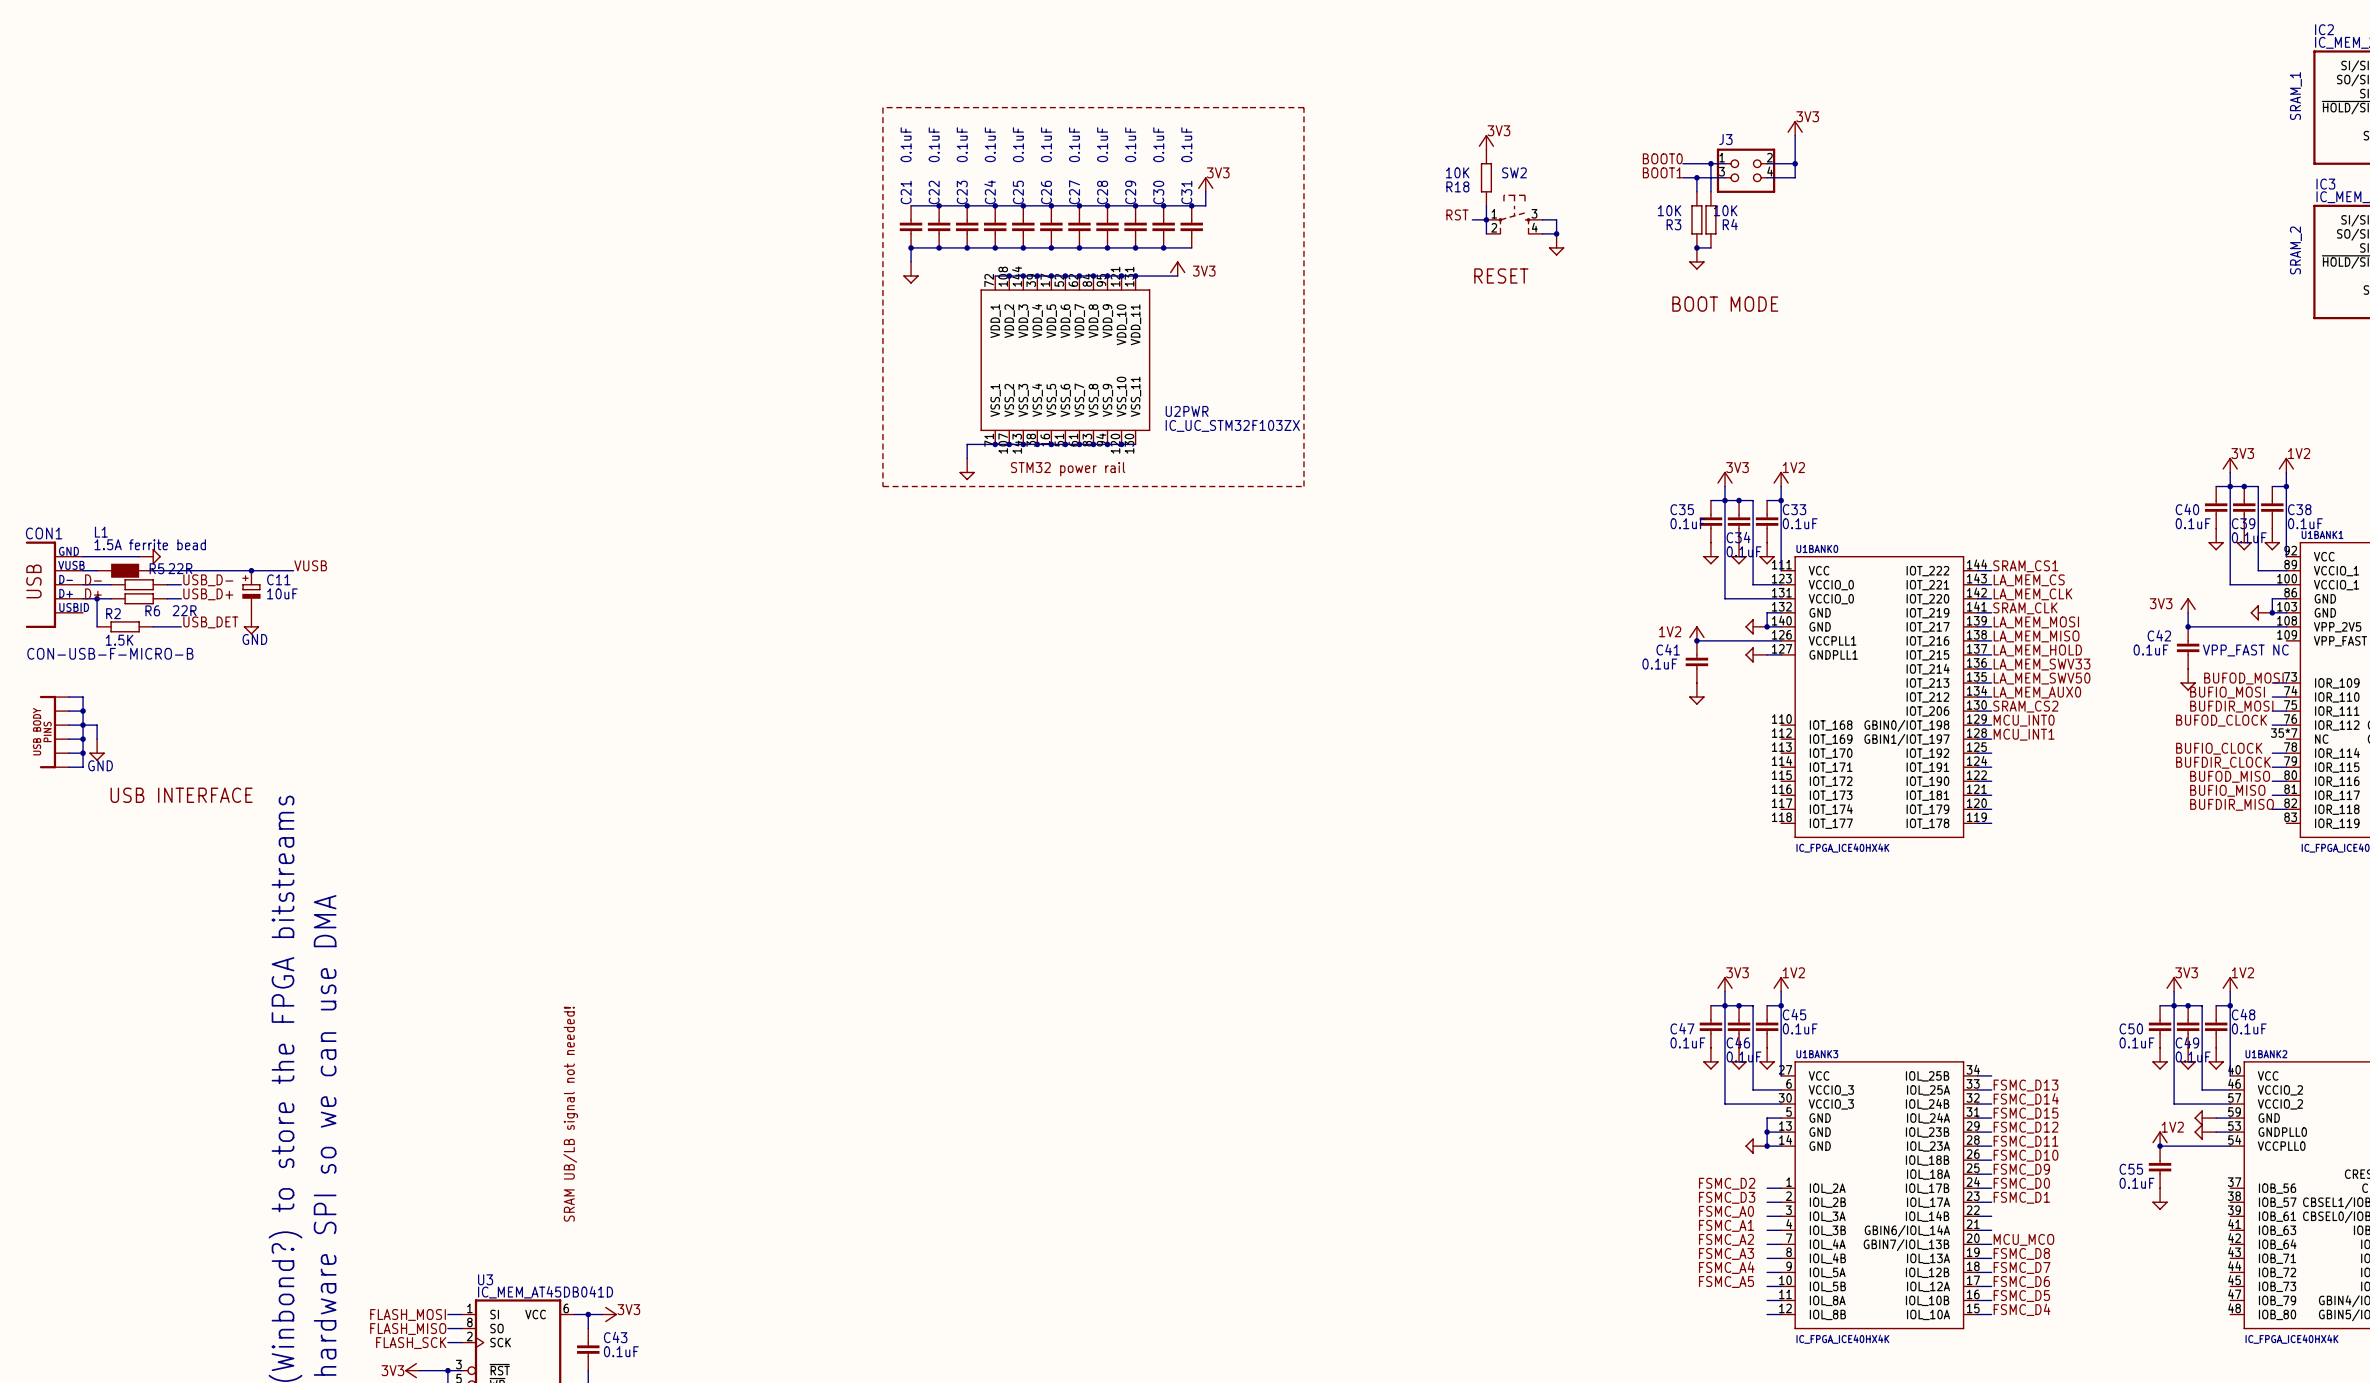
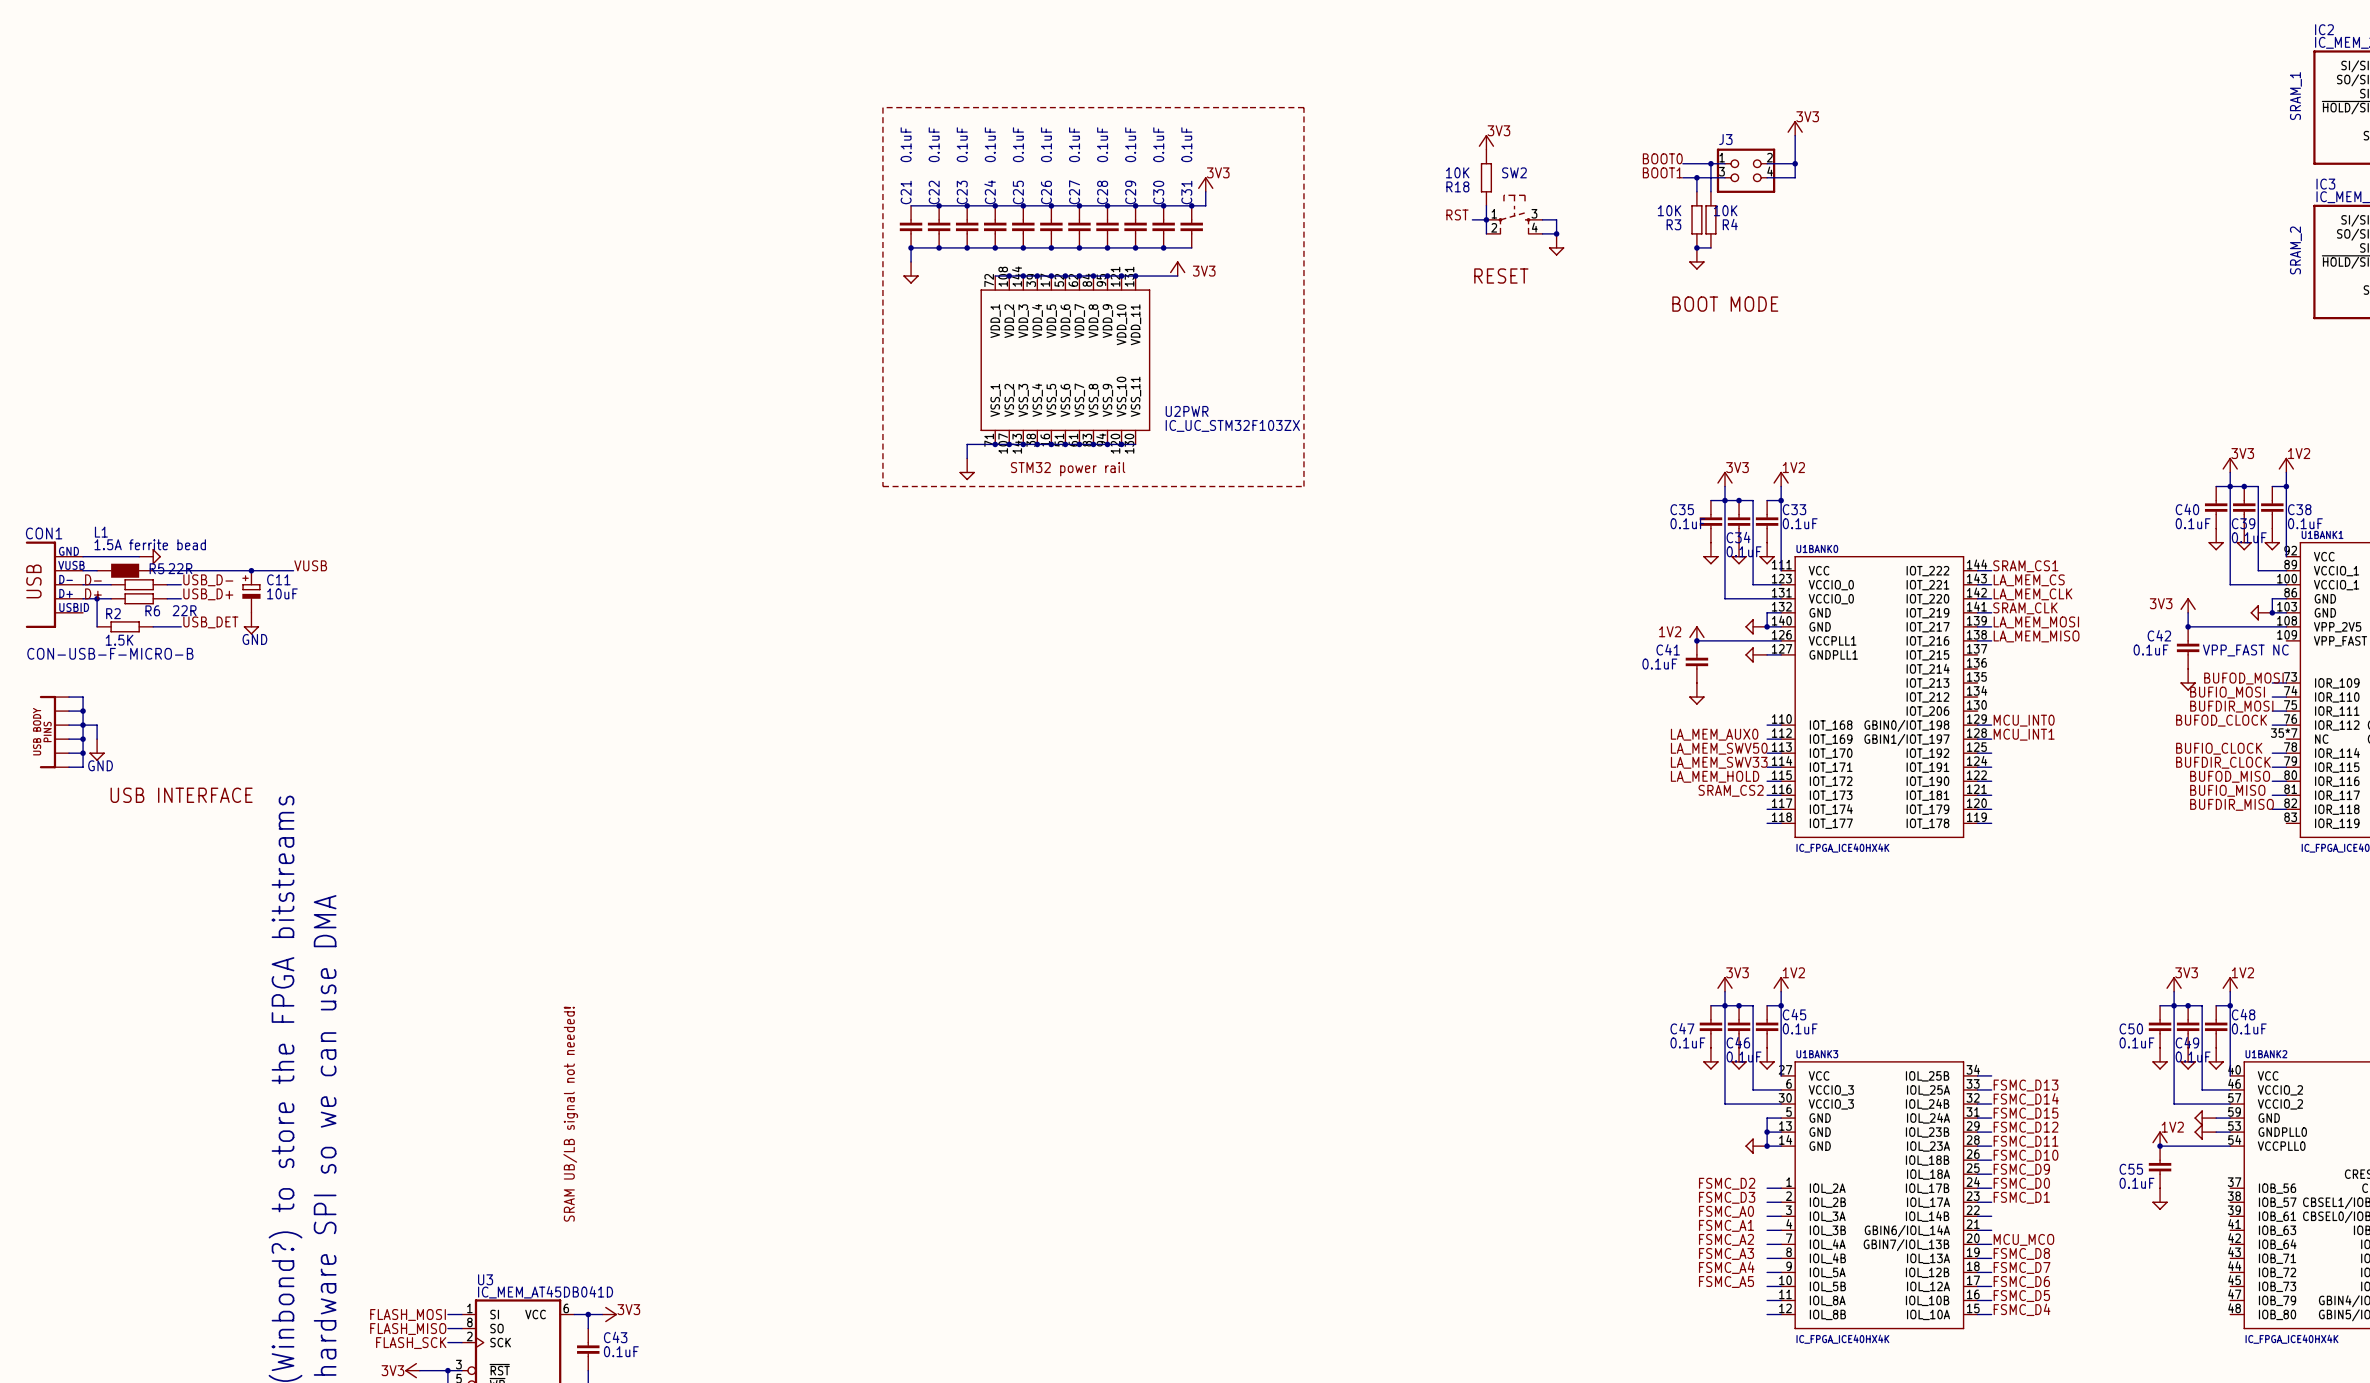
label: LA_MEM_HOLD (2037, 650) -> none
wire: (1977, 654) (1991, 654) -> none
label: LA_MEM_SWV33 (2042, 664) -> none
wire: (1977, 668) (1991, 668) -> none
label: LA_MEM_SWV50 (2042, 678) -> none
wire: (1977, 682) (1991, 682) -> none
label: LA_MEM_AUX0 (2037, 692) -> none
wire: (1977, 697) (1991, 697) -> none
label: SRAM_CS2 (2025, 706) -> none
wire: (1977, 711) (1991, 711) -> none
wire: none -> (1767, 725) (1781, 725)
label: none -> LA_MEM_AUX0 (1714, 734)
wire: none -> (1767, 739) (1781, 739)
label: none -> LA_MEM_SWV50 (1719, 748)
wire: none -> (1767, 753) (1781, 753)
label: none -> LA_MEM_SWV33 (1719, 762)
wire: none -> (1767, 767) (1781, 767)
label: none -> LA_MEM_HOLD (1715, 776)
wire: none -> (1767, 781) (1781, 781)
label: none -> SRAM_CS2 (1731, 790)
wire: none -> (1767, 795) (1781, 795)
wire: none -> (1767, 809) (1781, 809)
wire: none -> (1767, 823) (1781, 823)

